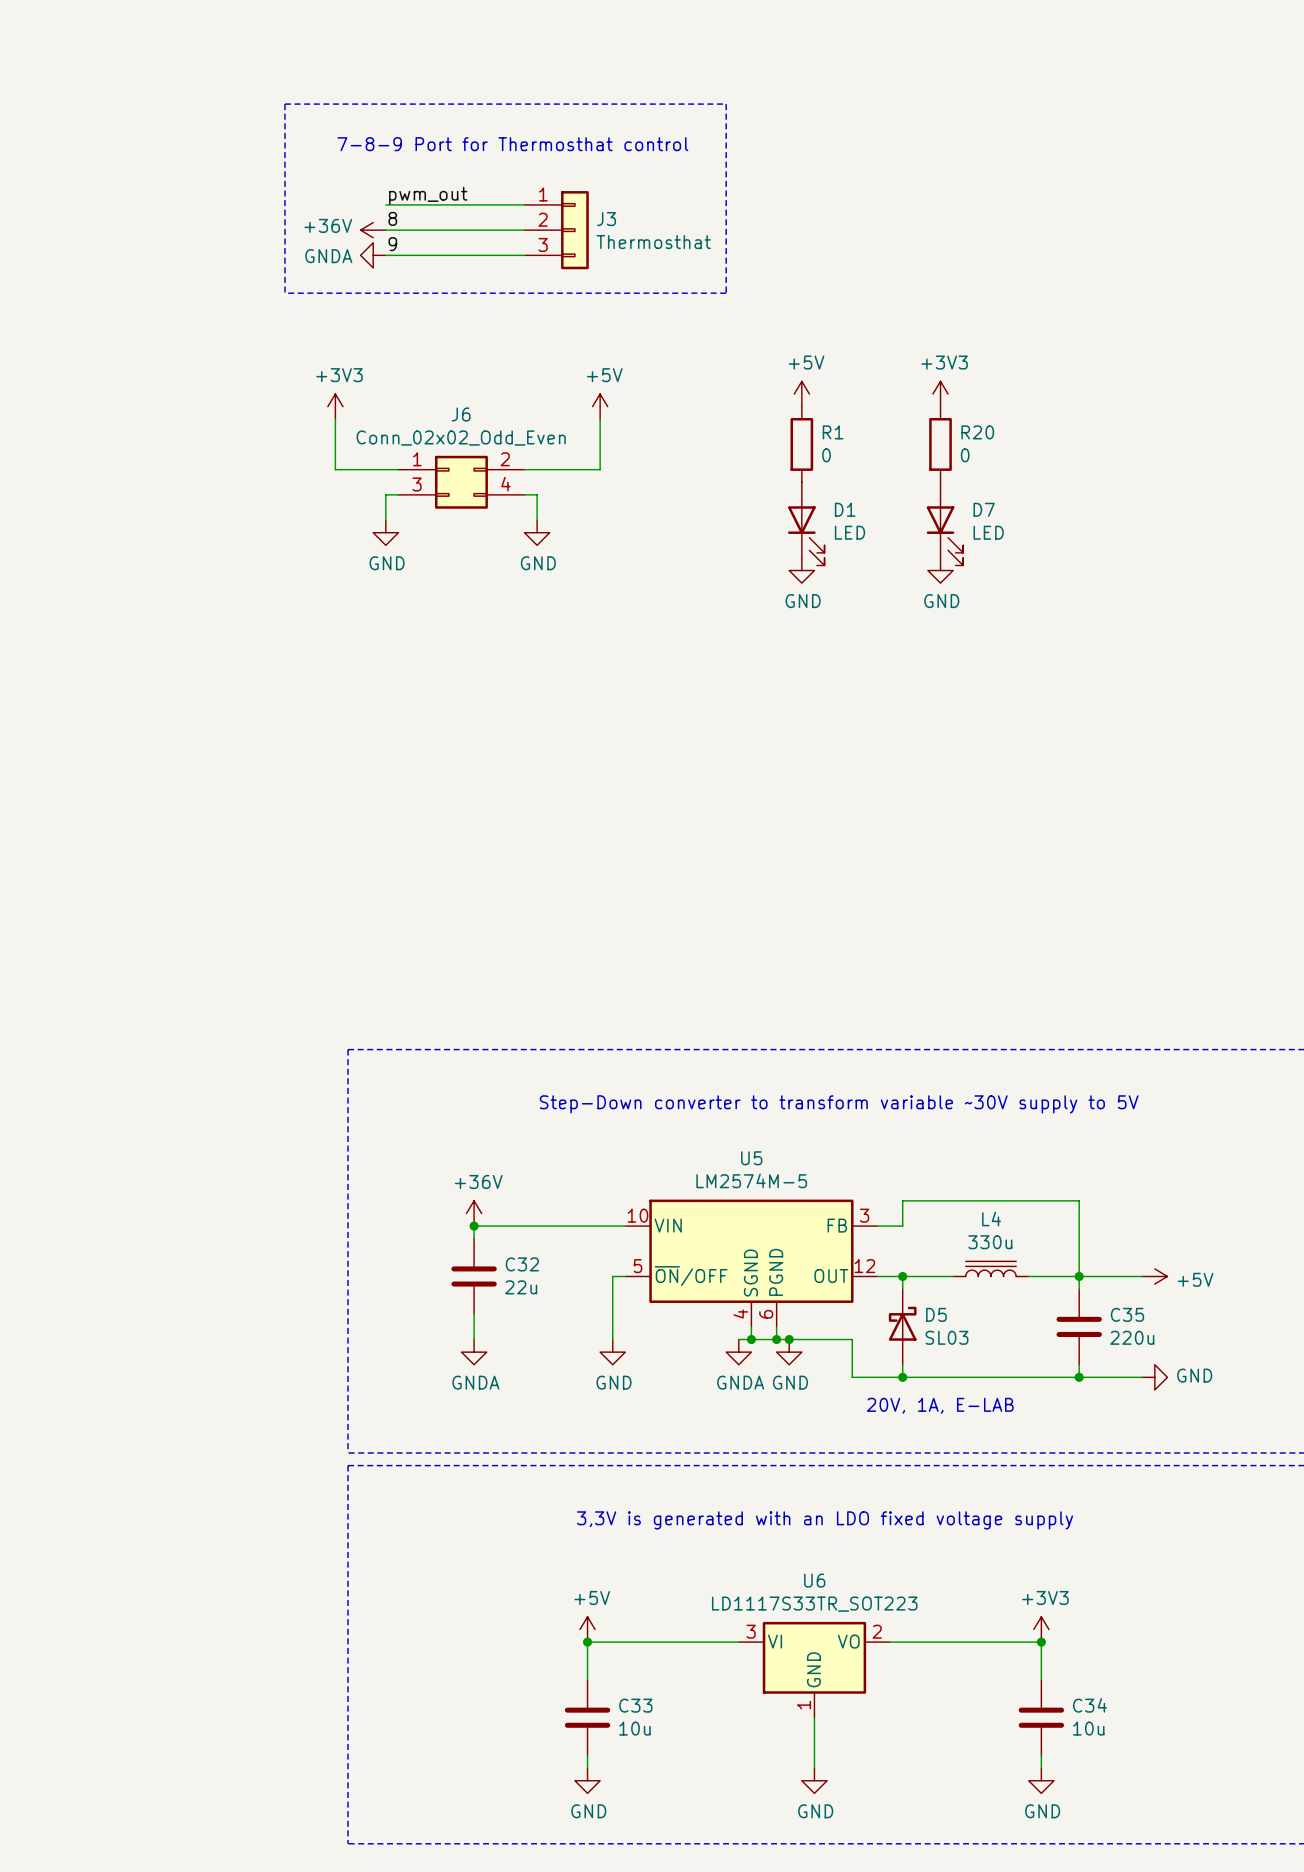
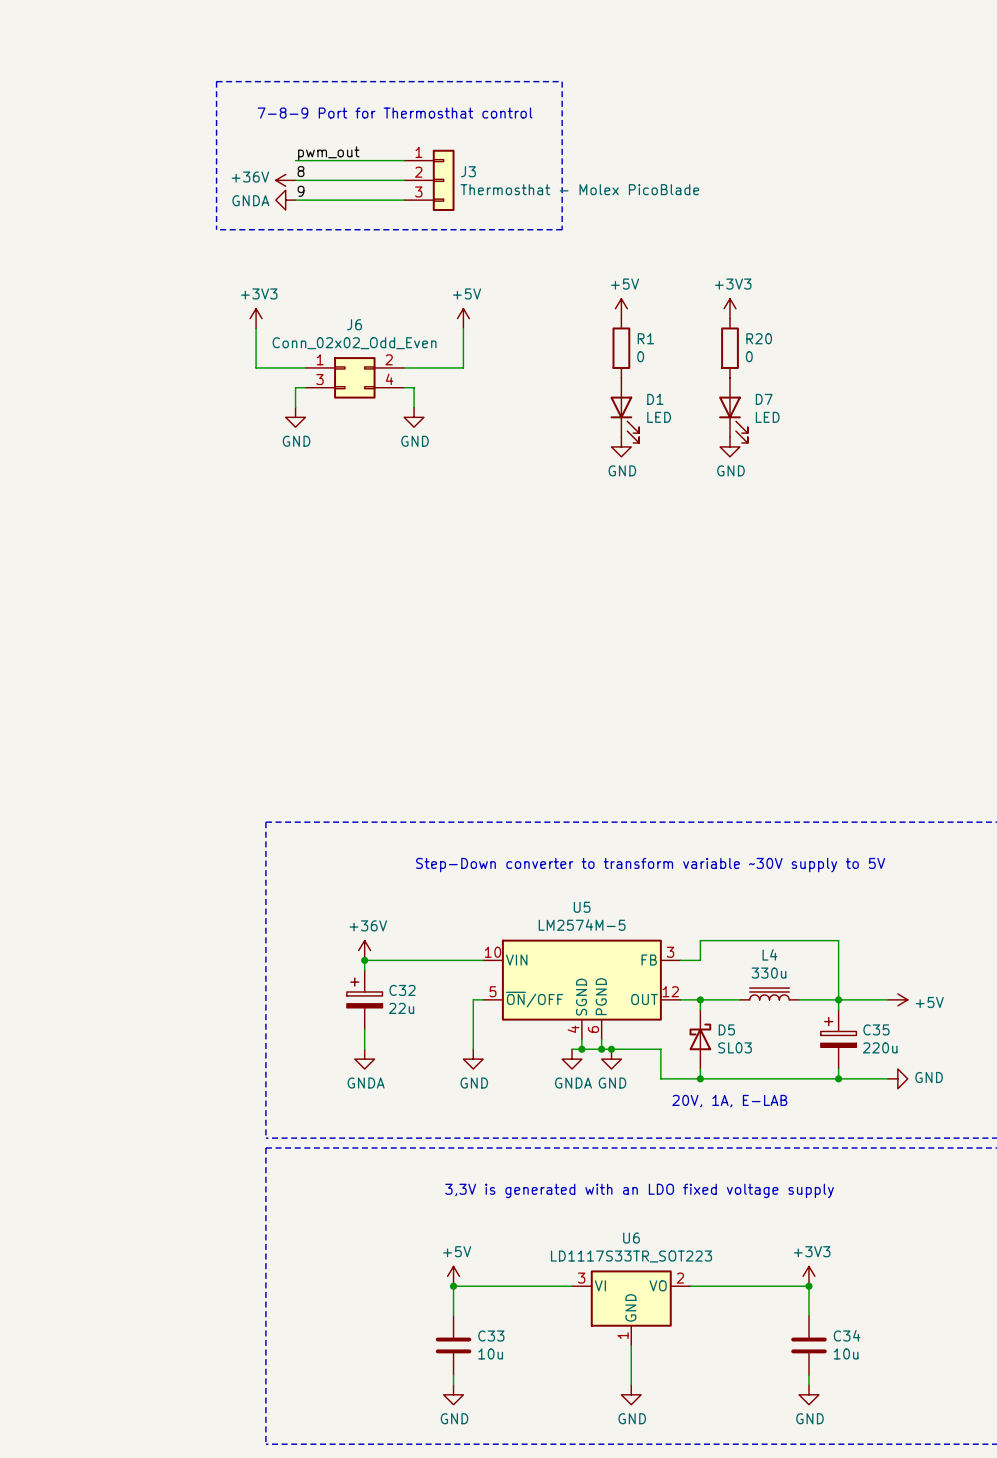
J3 value: Thermosthat (653, 242) -> Thermosthat - Molex PicoBlade (579, 189)
C32 symbol: [451, 1238, 497, 1315] -> [346, 970, 383, 1030]
C35 symbol: [1056, 1289, 1102, 1365] -> [820, 1009, 857, 1070]

